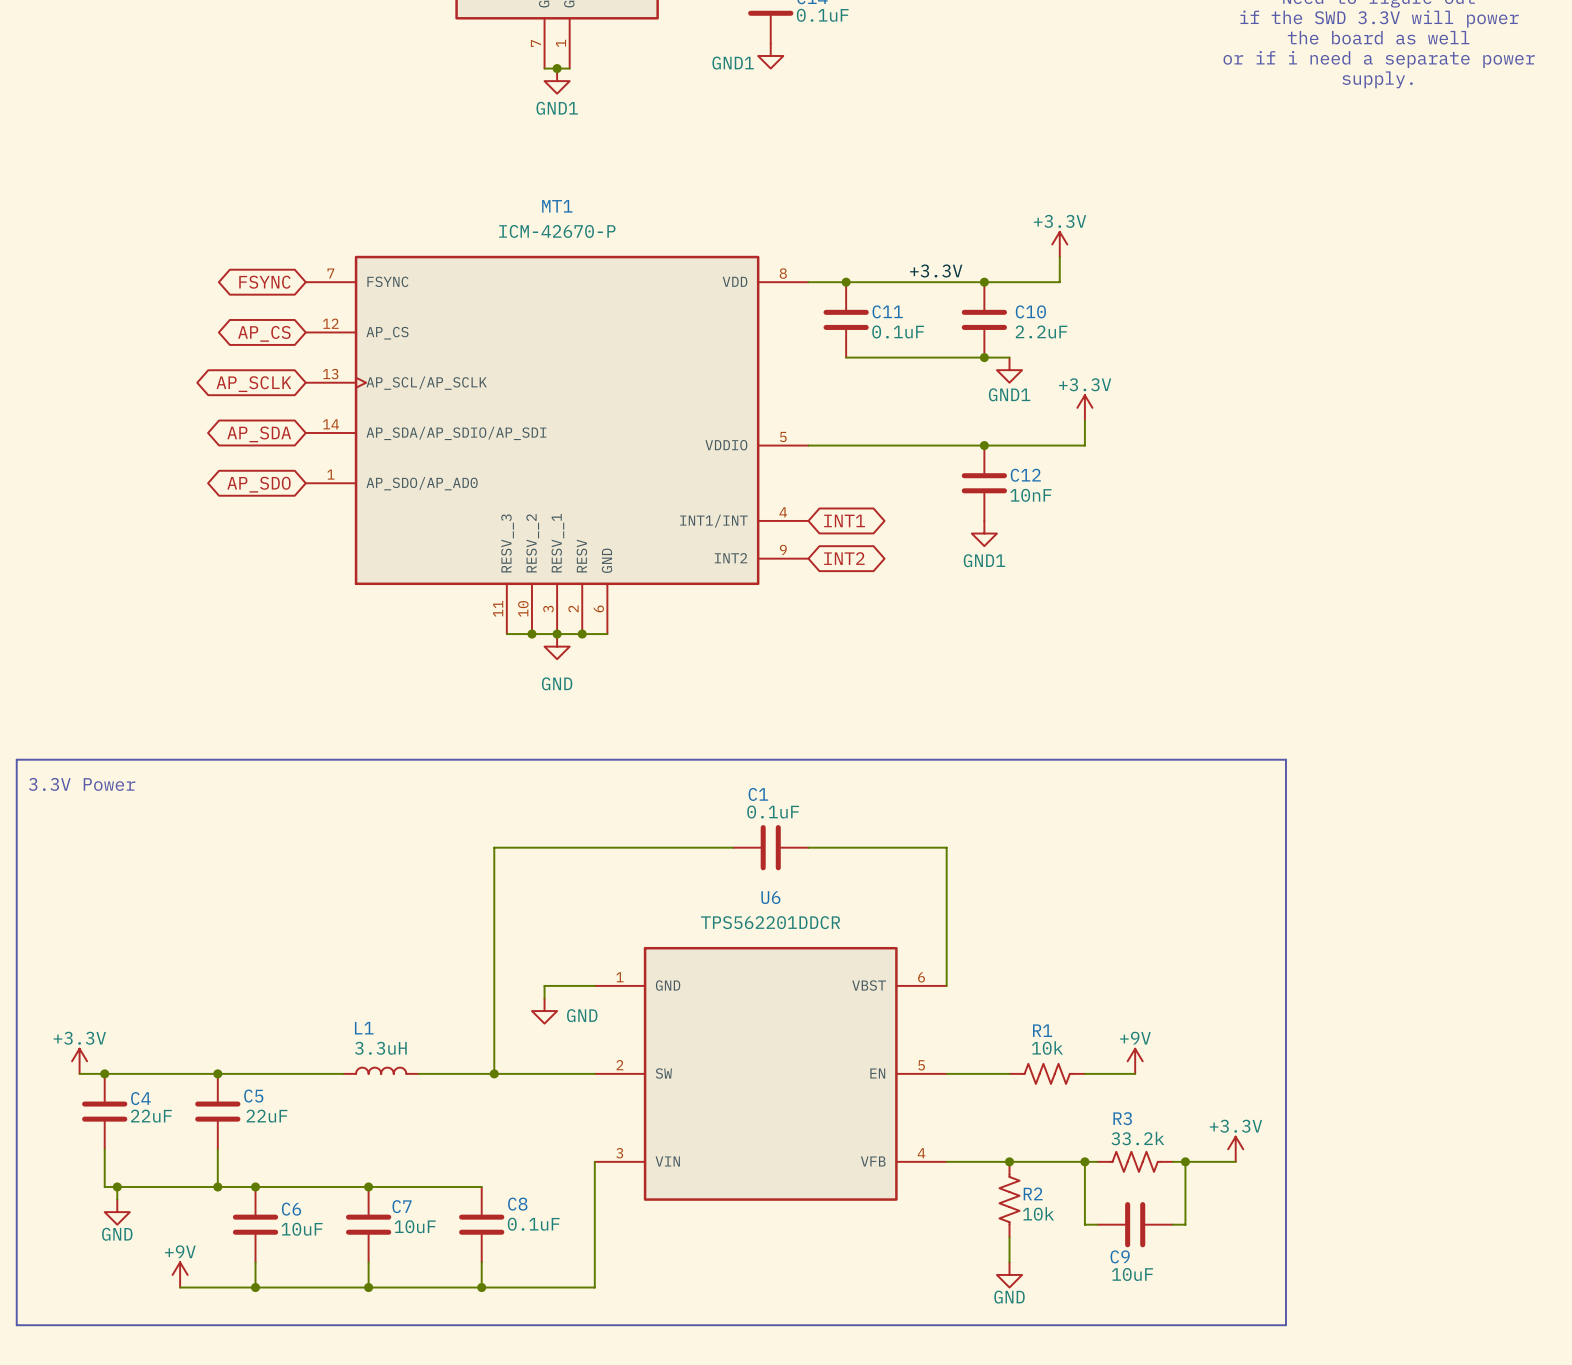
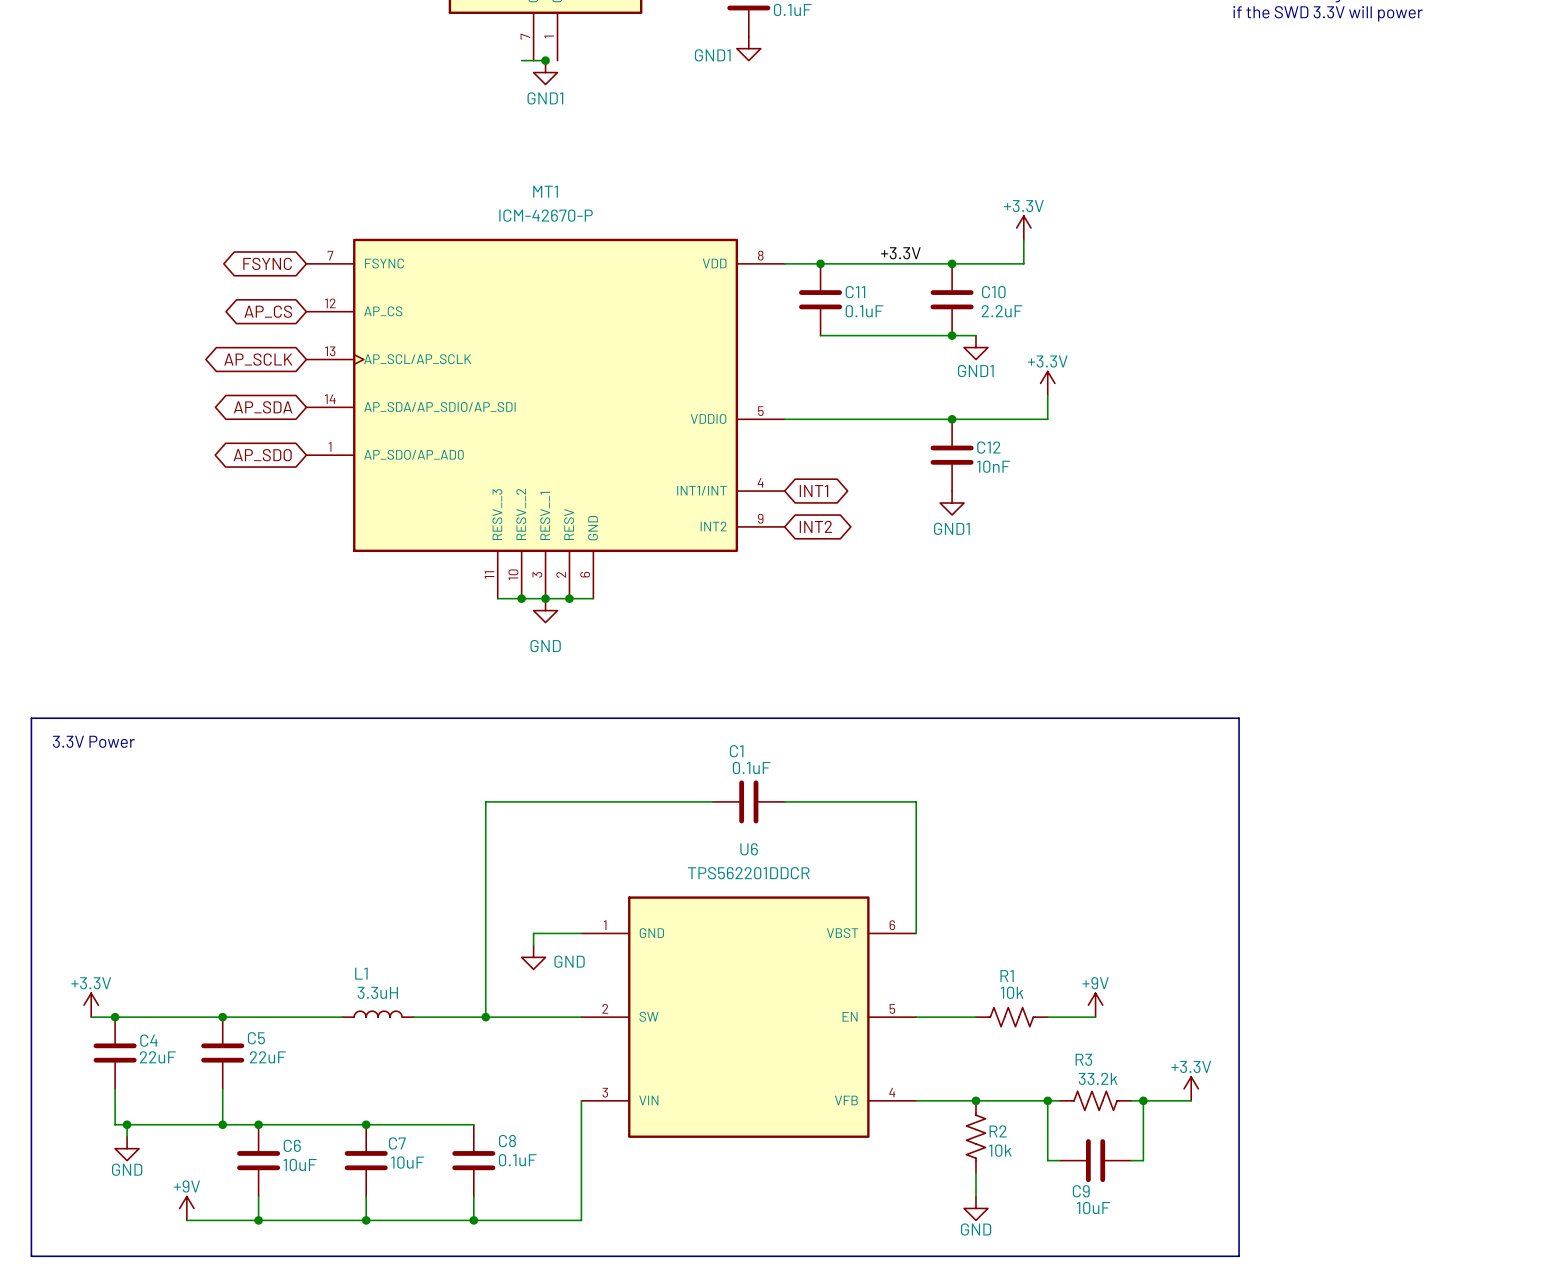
text: the board as well (1378, 37) -> none
text: or if i need a separate power (1379, 59) -> none
wire: (557, 68) (569, 68) -> (521, 60) (533, 60)
text: supply. (1377, 79) -> none

